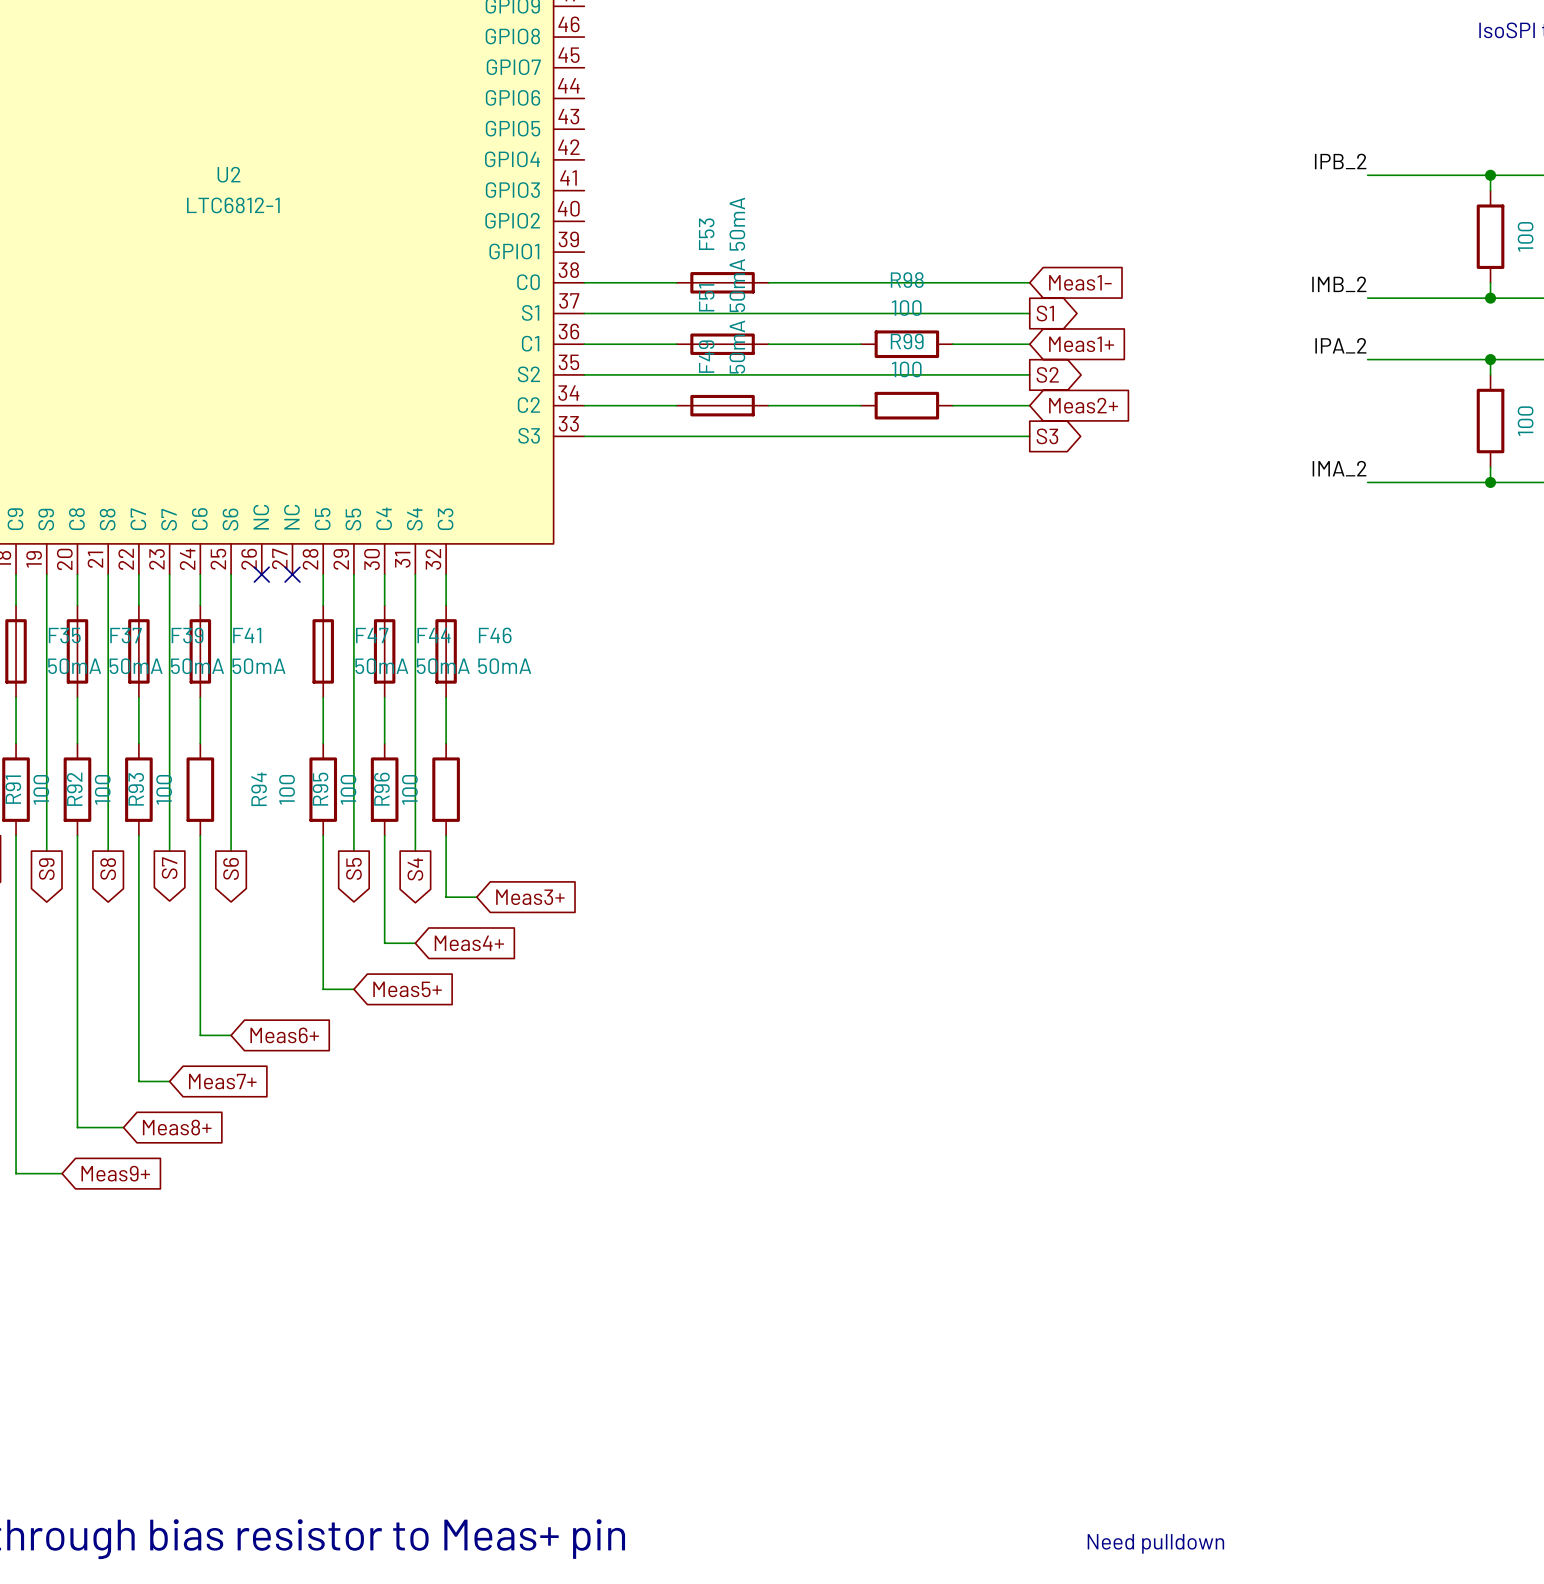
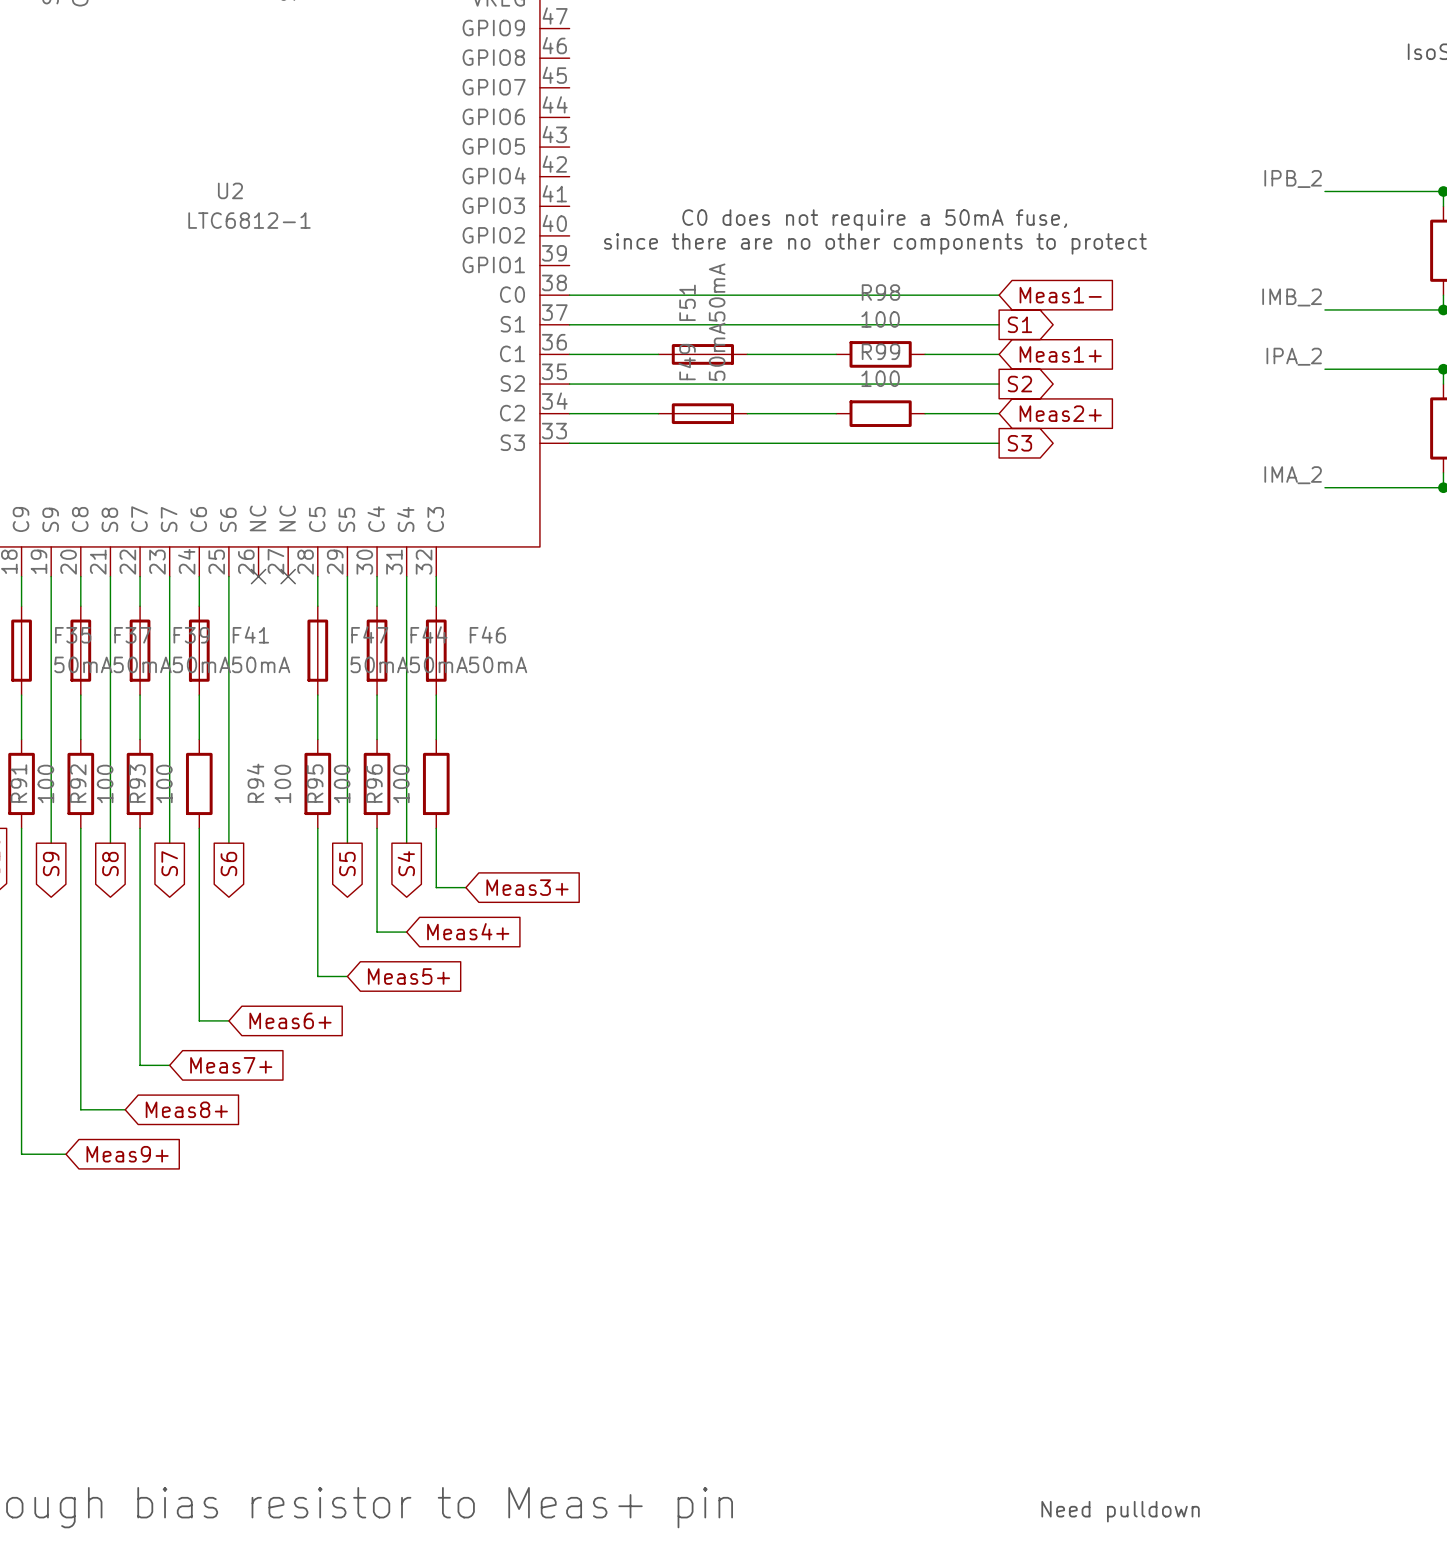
text: none -> C0 does not require a 50mA fuse, (874, 220)
text: none -> since there are no other components to protect (875, 243)
F53: 50mA (722, 282) -> none

